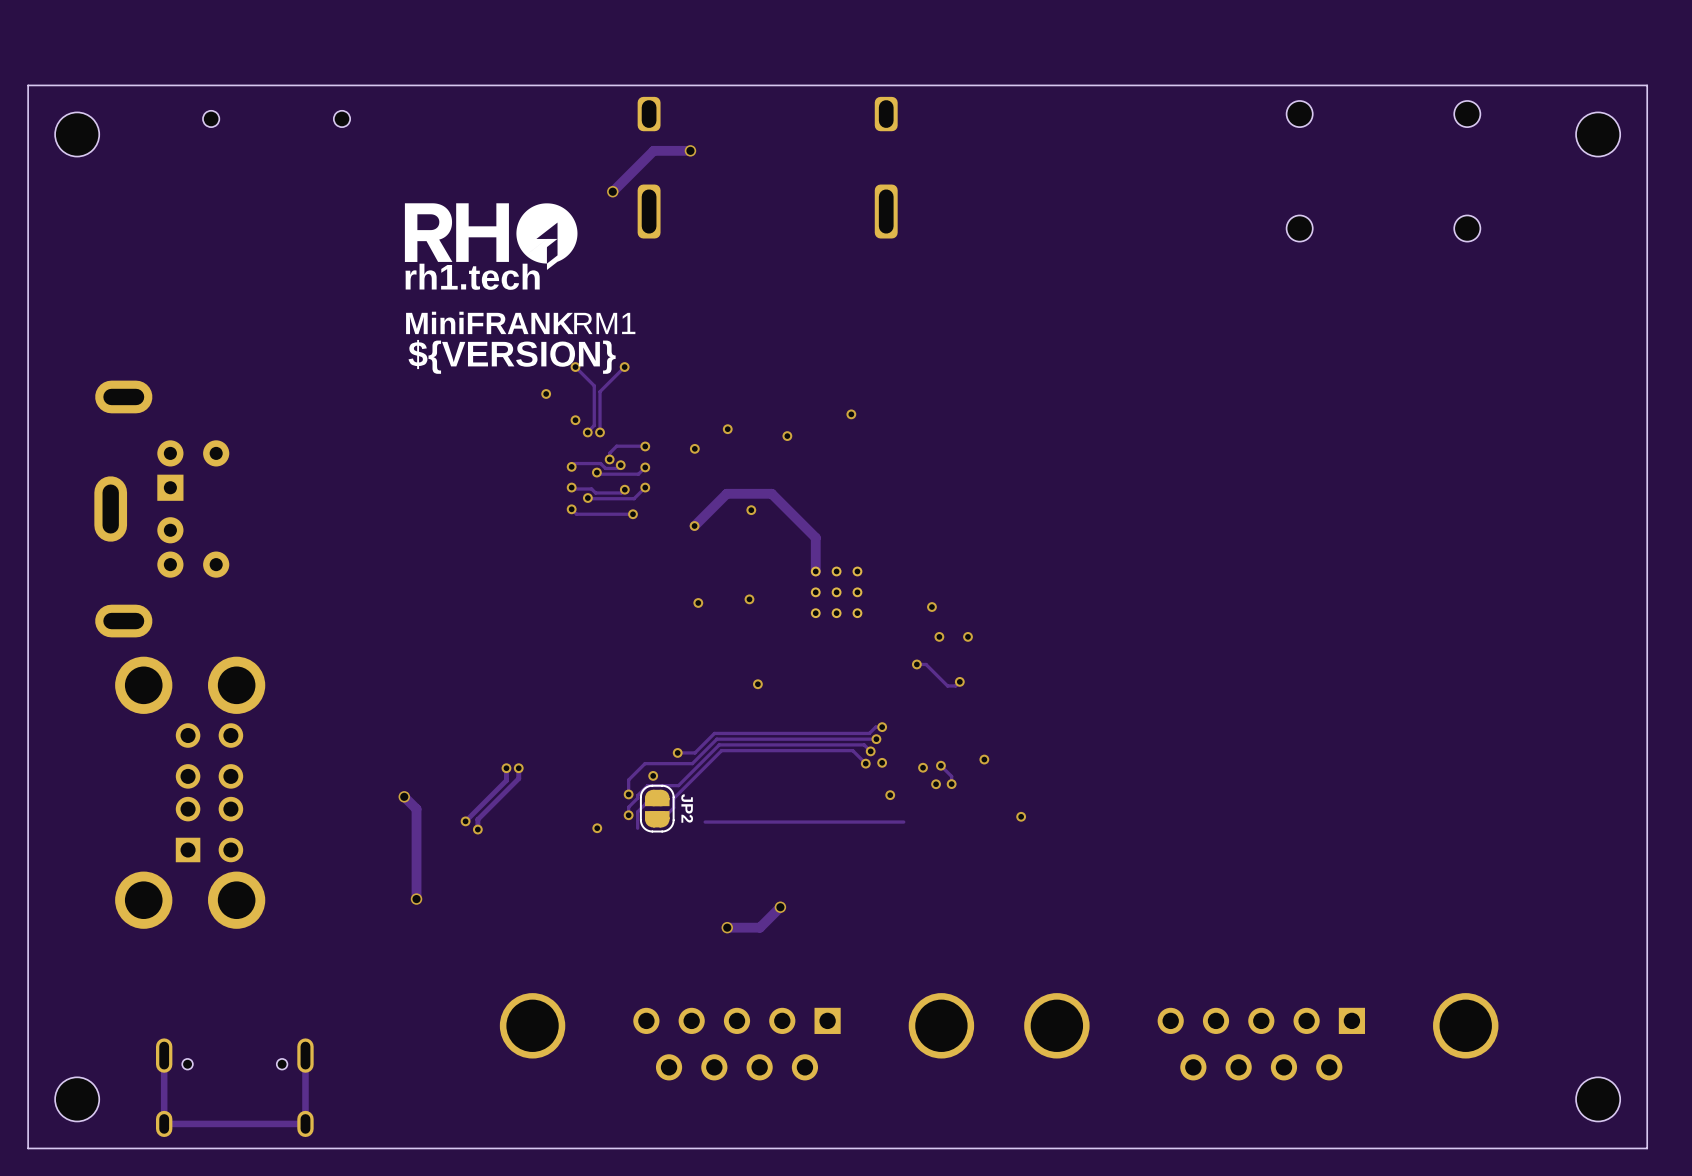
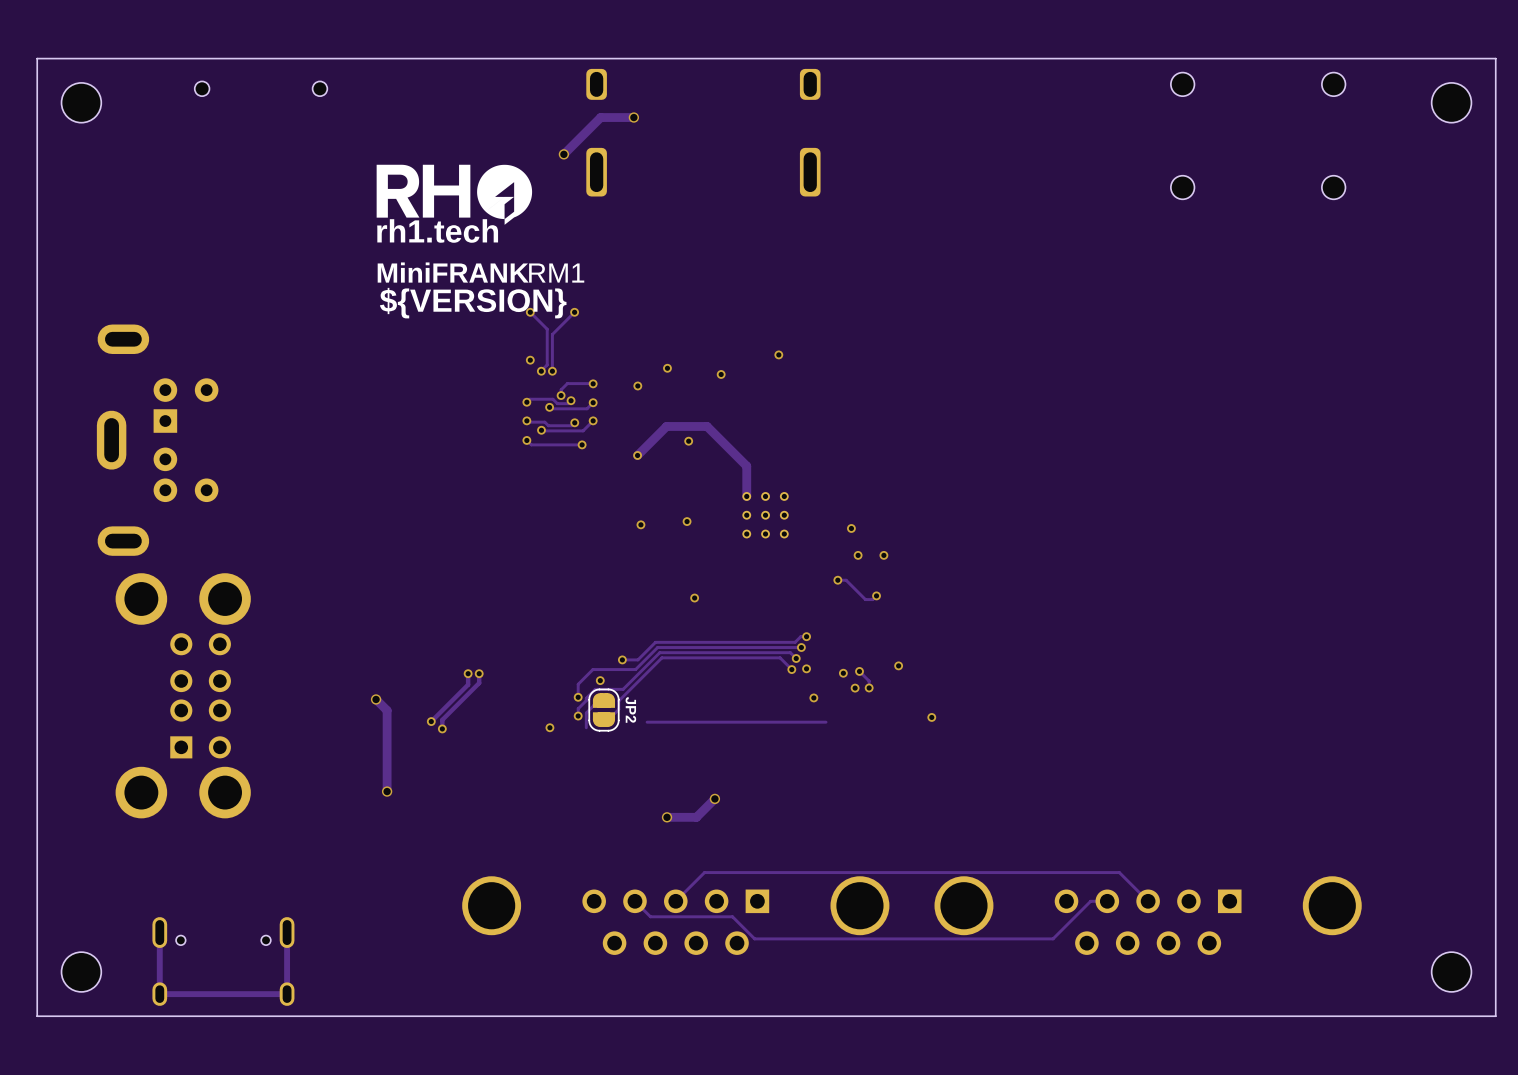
via: (546, 393) -> none
track: none -> (1107, 901) (1090, 901) (1053, 938) (754, 938) (732, 916) (650, 916) (634, 901)
track: none -> (1148, 901) (1119, 872) (704, 872) (675, 901)

